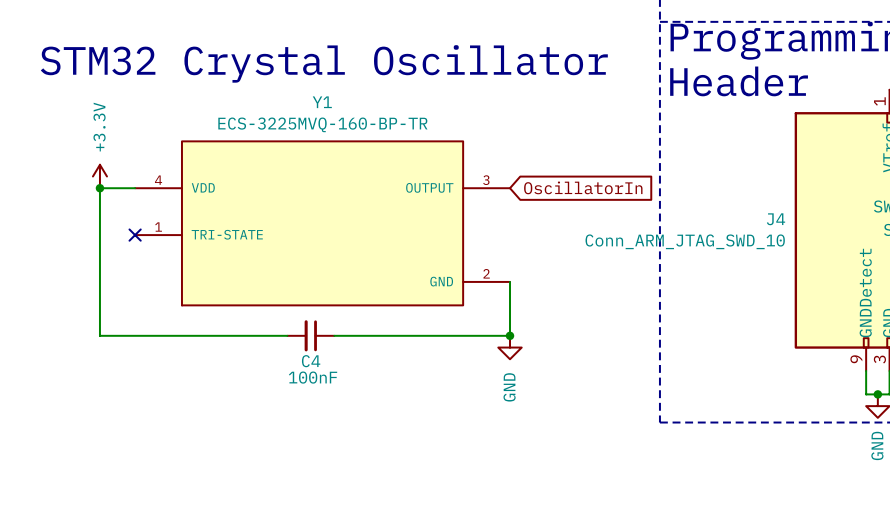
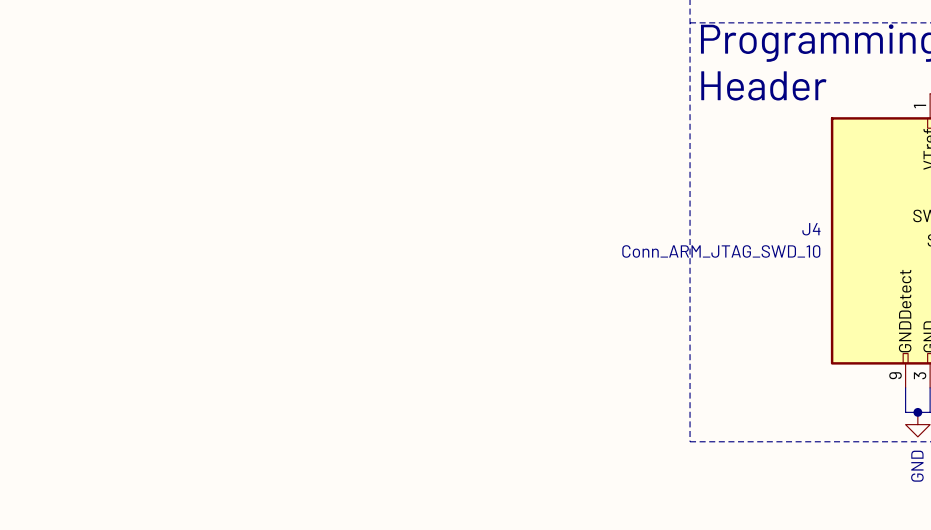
text: STM32 Crystal Oscillator (324, 63) -> none
power symbol: +3.3V (99, 176) -> none
global label: OscillatorIn (583, 187) -> none
junction: (99, 188) -> none
wire: (135, 188) (99, 188) (99, 335) (287, 335) -> none
Y1: ECS-3225MVQ-160-BP-TR (322, 223) -> none
no-connect mark: (135, 235) -> none
wire: (510, 281) (510, 335) (334, 335) -> none
C4: 100nF (310, 335) -> none
junction: (510, 335) -> none
power symbol: GND (510, 347) -> none

